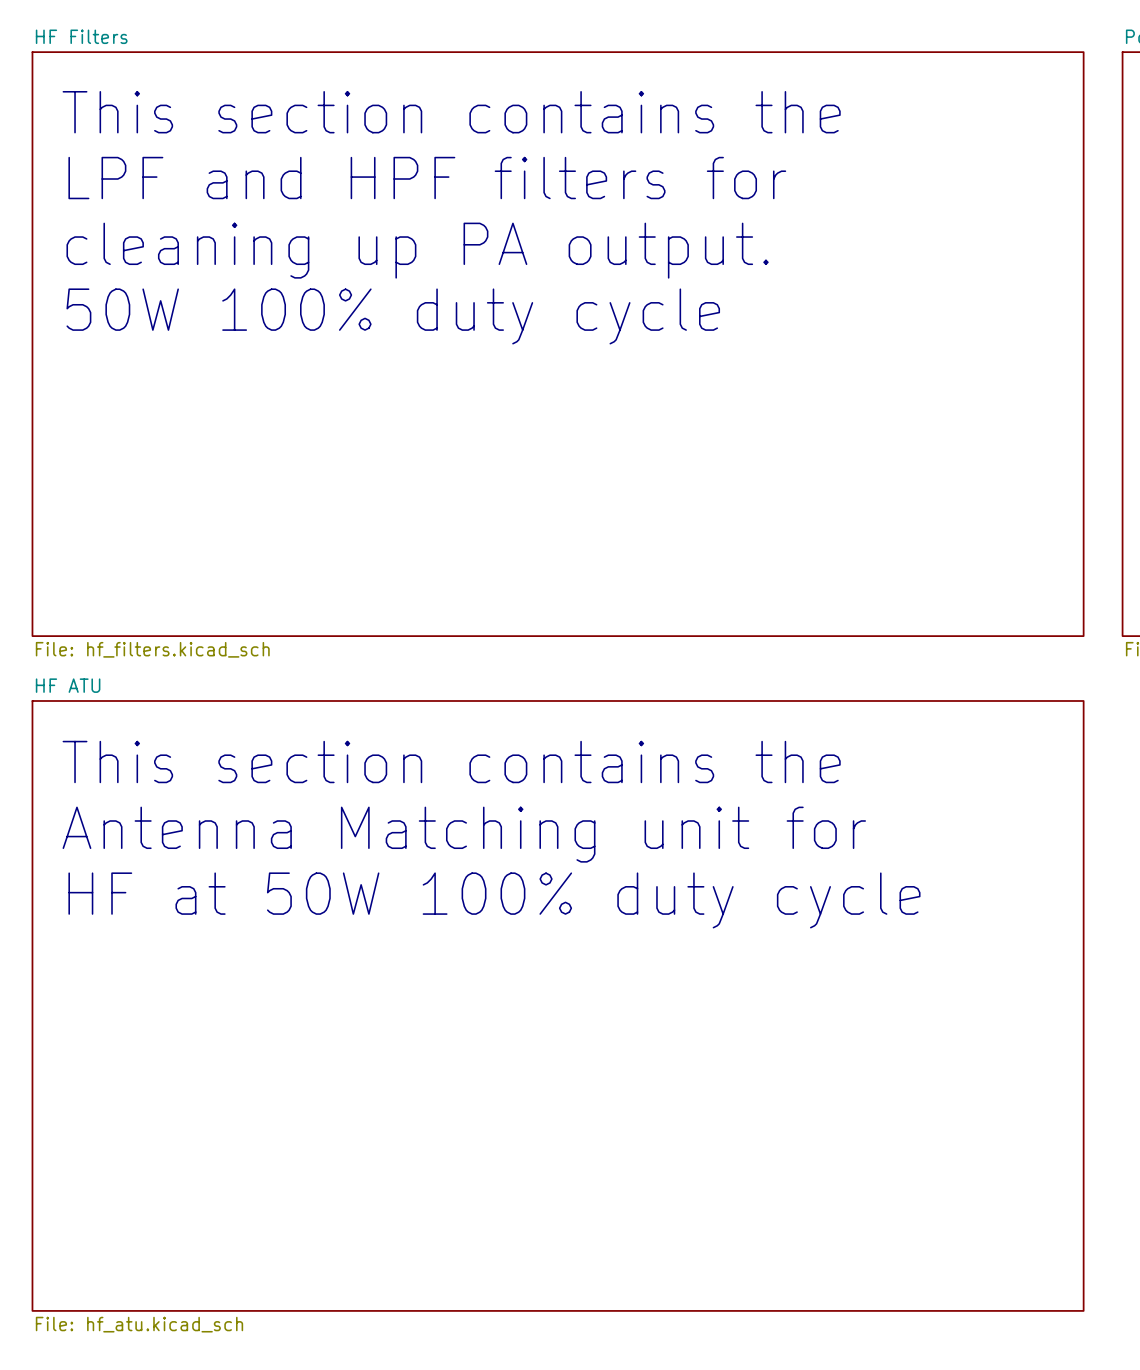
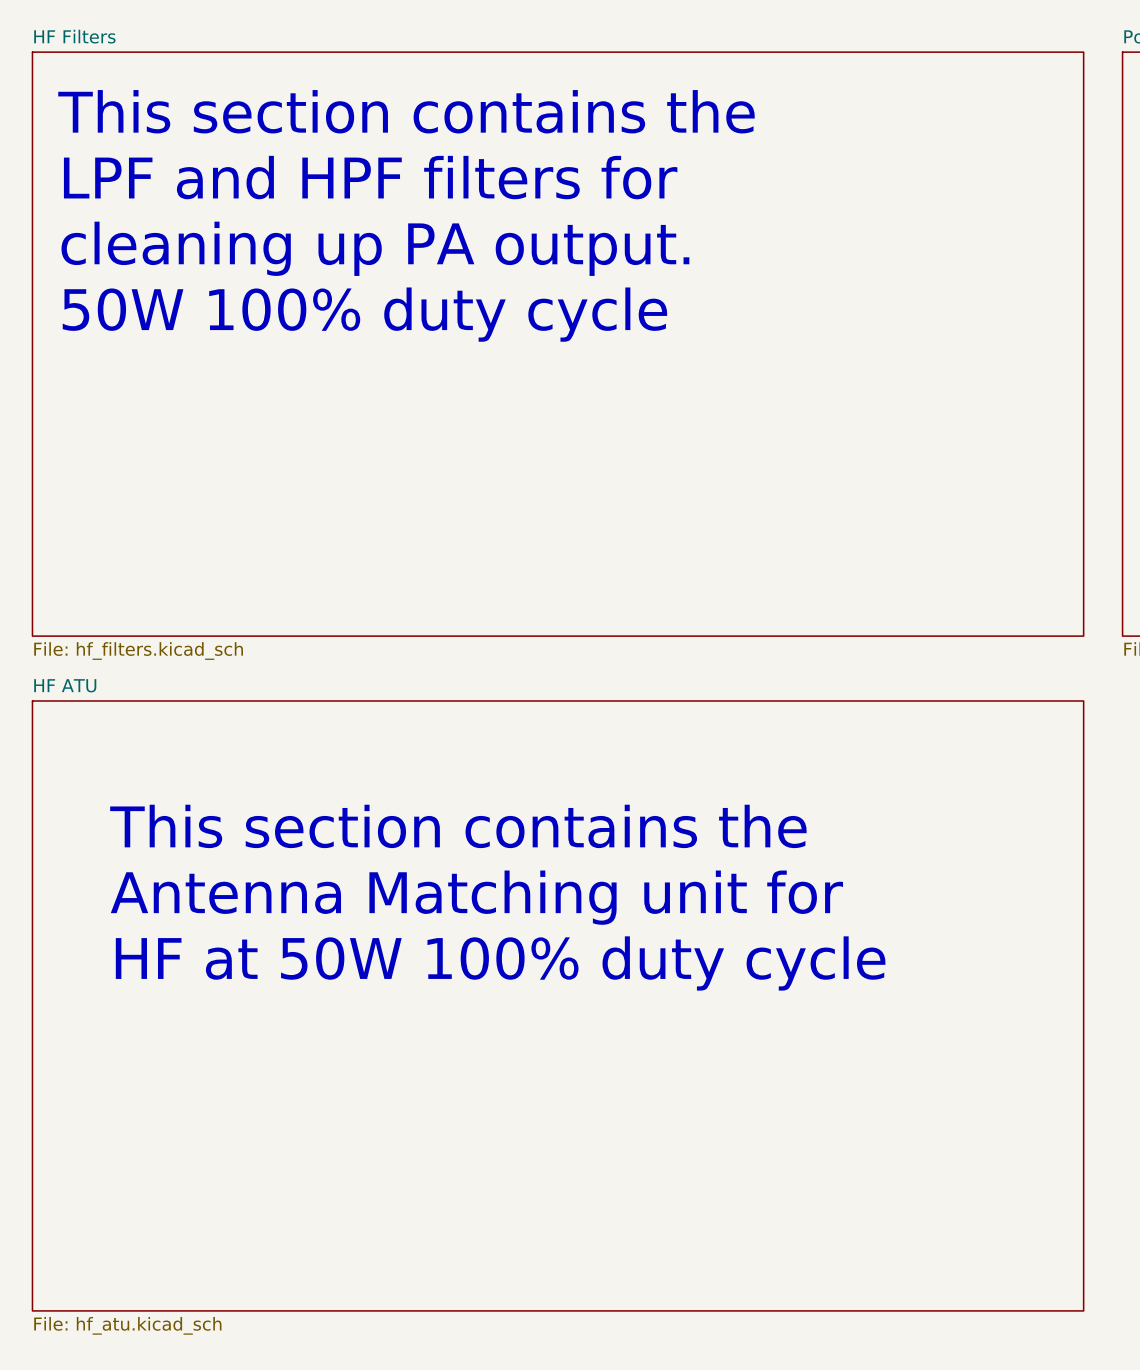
text position: This section contains the (451, 762) -> This section contains the (458, 826)
text position: Antenna Matching unit for (464, 834) -> Antenna Matching unit for (476, 897)
text position: HF at 50W 100% duty cycle (494, 900) -> HF at 50W 100% duty cycle (500, 963)

